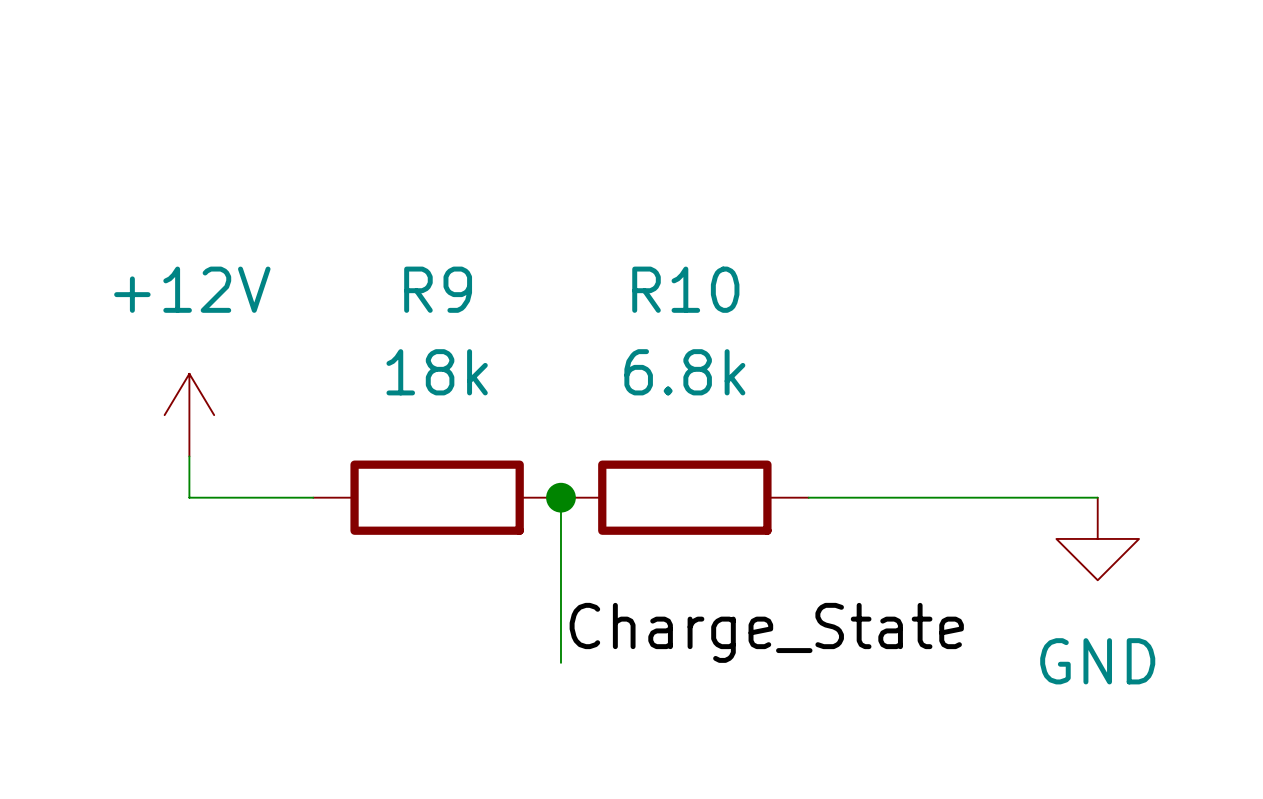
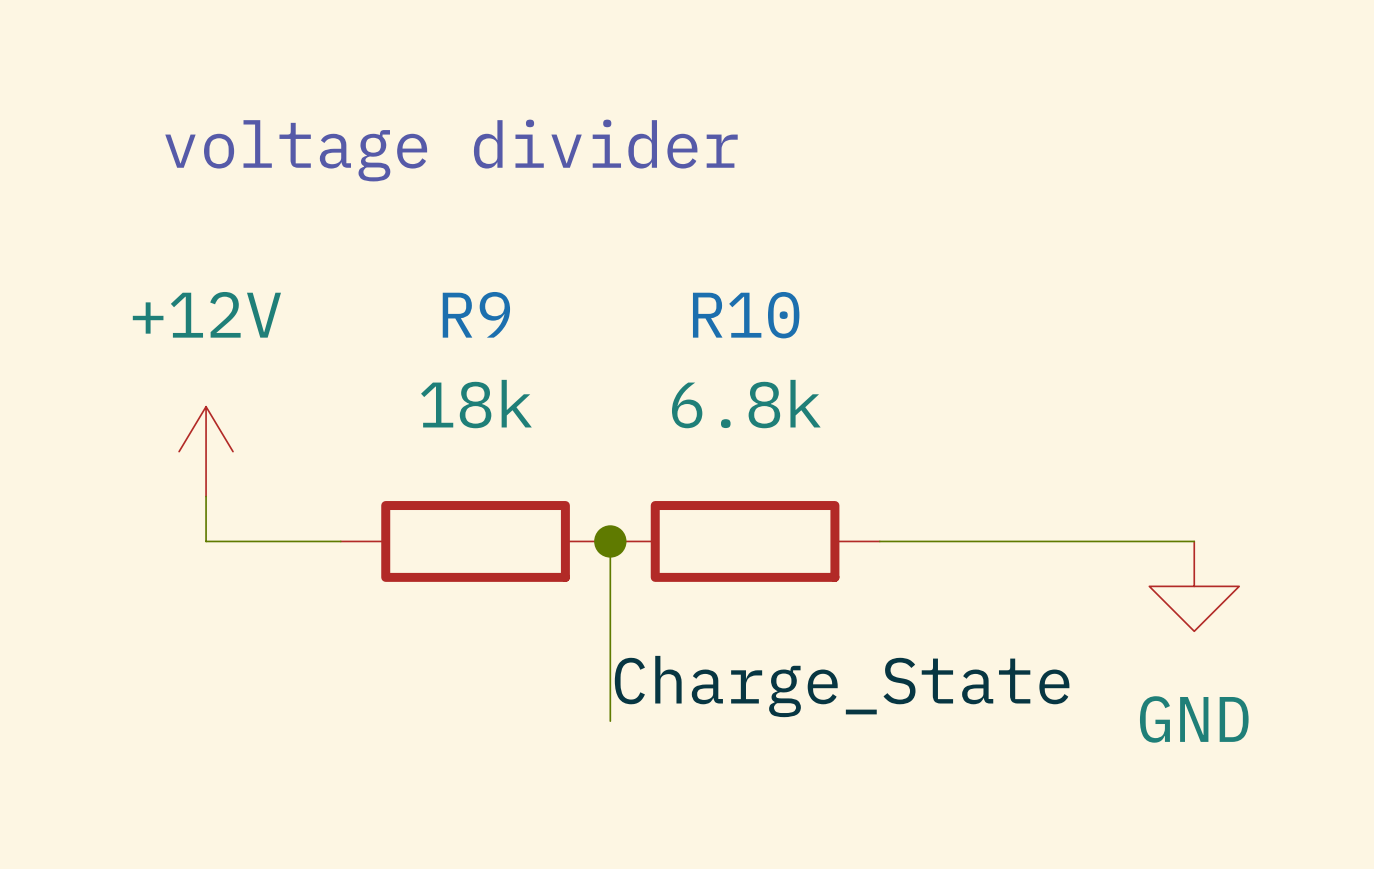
text: none -> voltage divider (451, 150)

